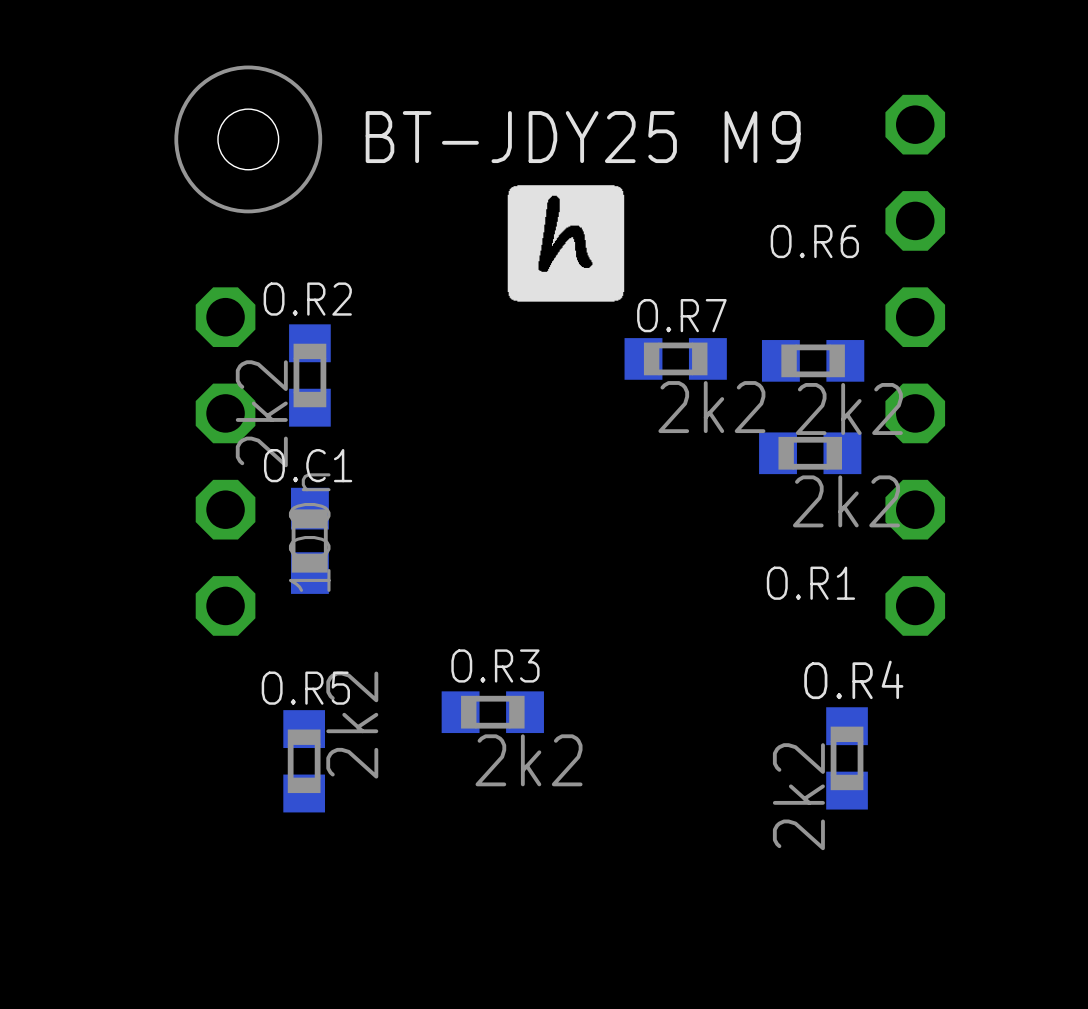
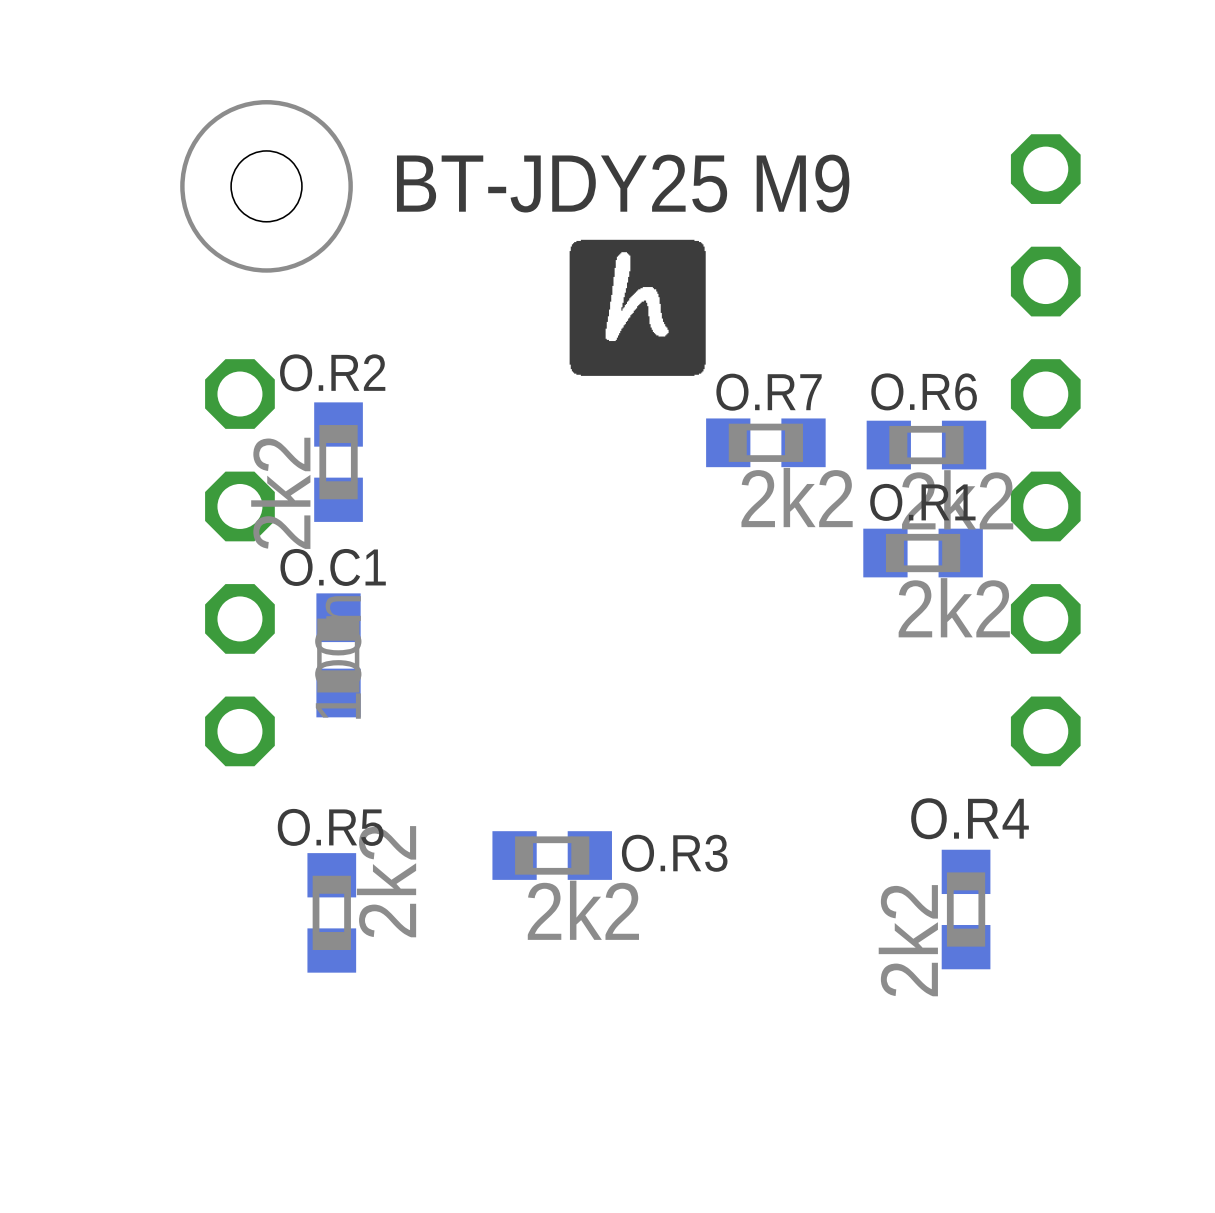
O.R6 name position: O.R6 (814, 241) -> O.R6 (924, 391)
O.R1 name position: O.R1 (810, 583) -> O.R1 (922, 502)
O.R3 name position: O.R3 (495, 665) -> O.R3 (674, 853)

